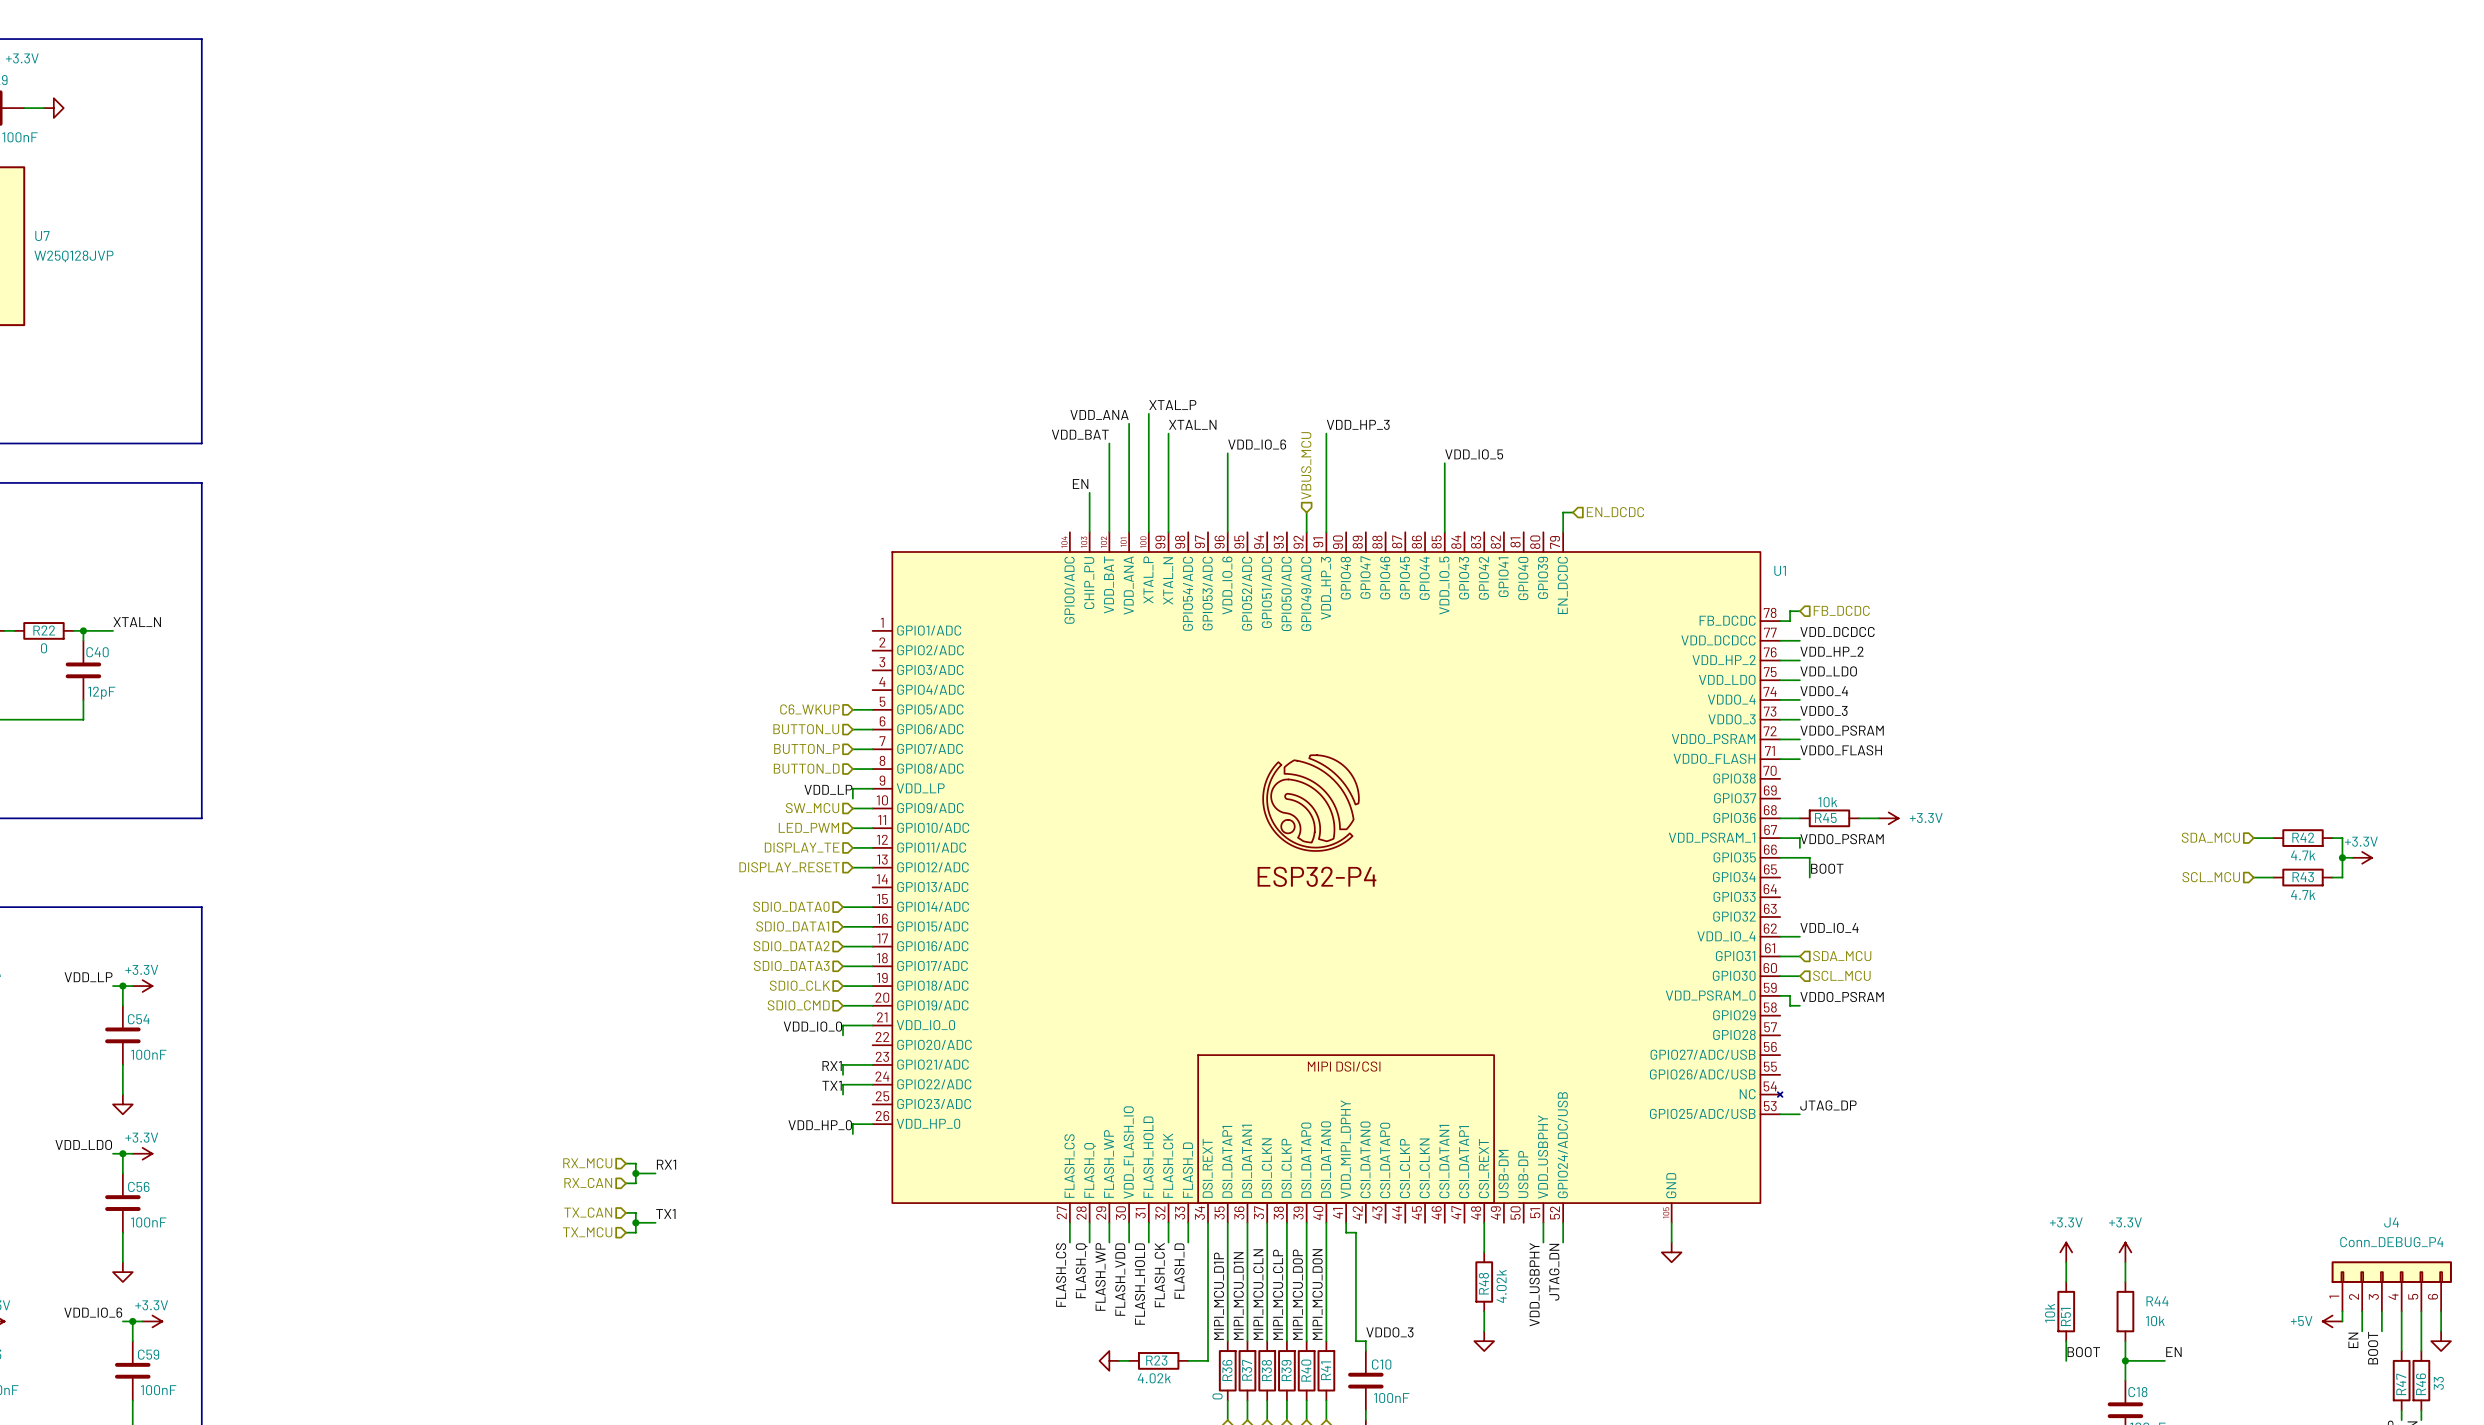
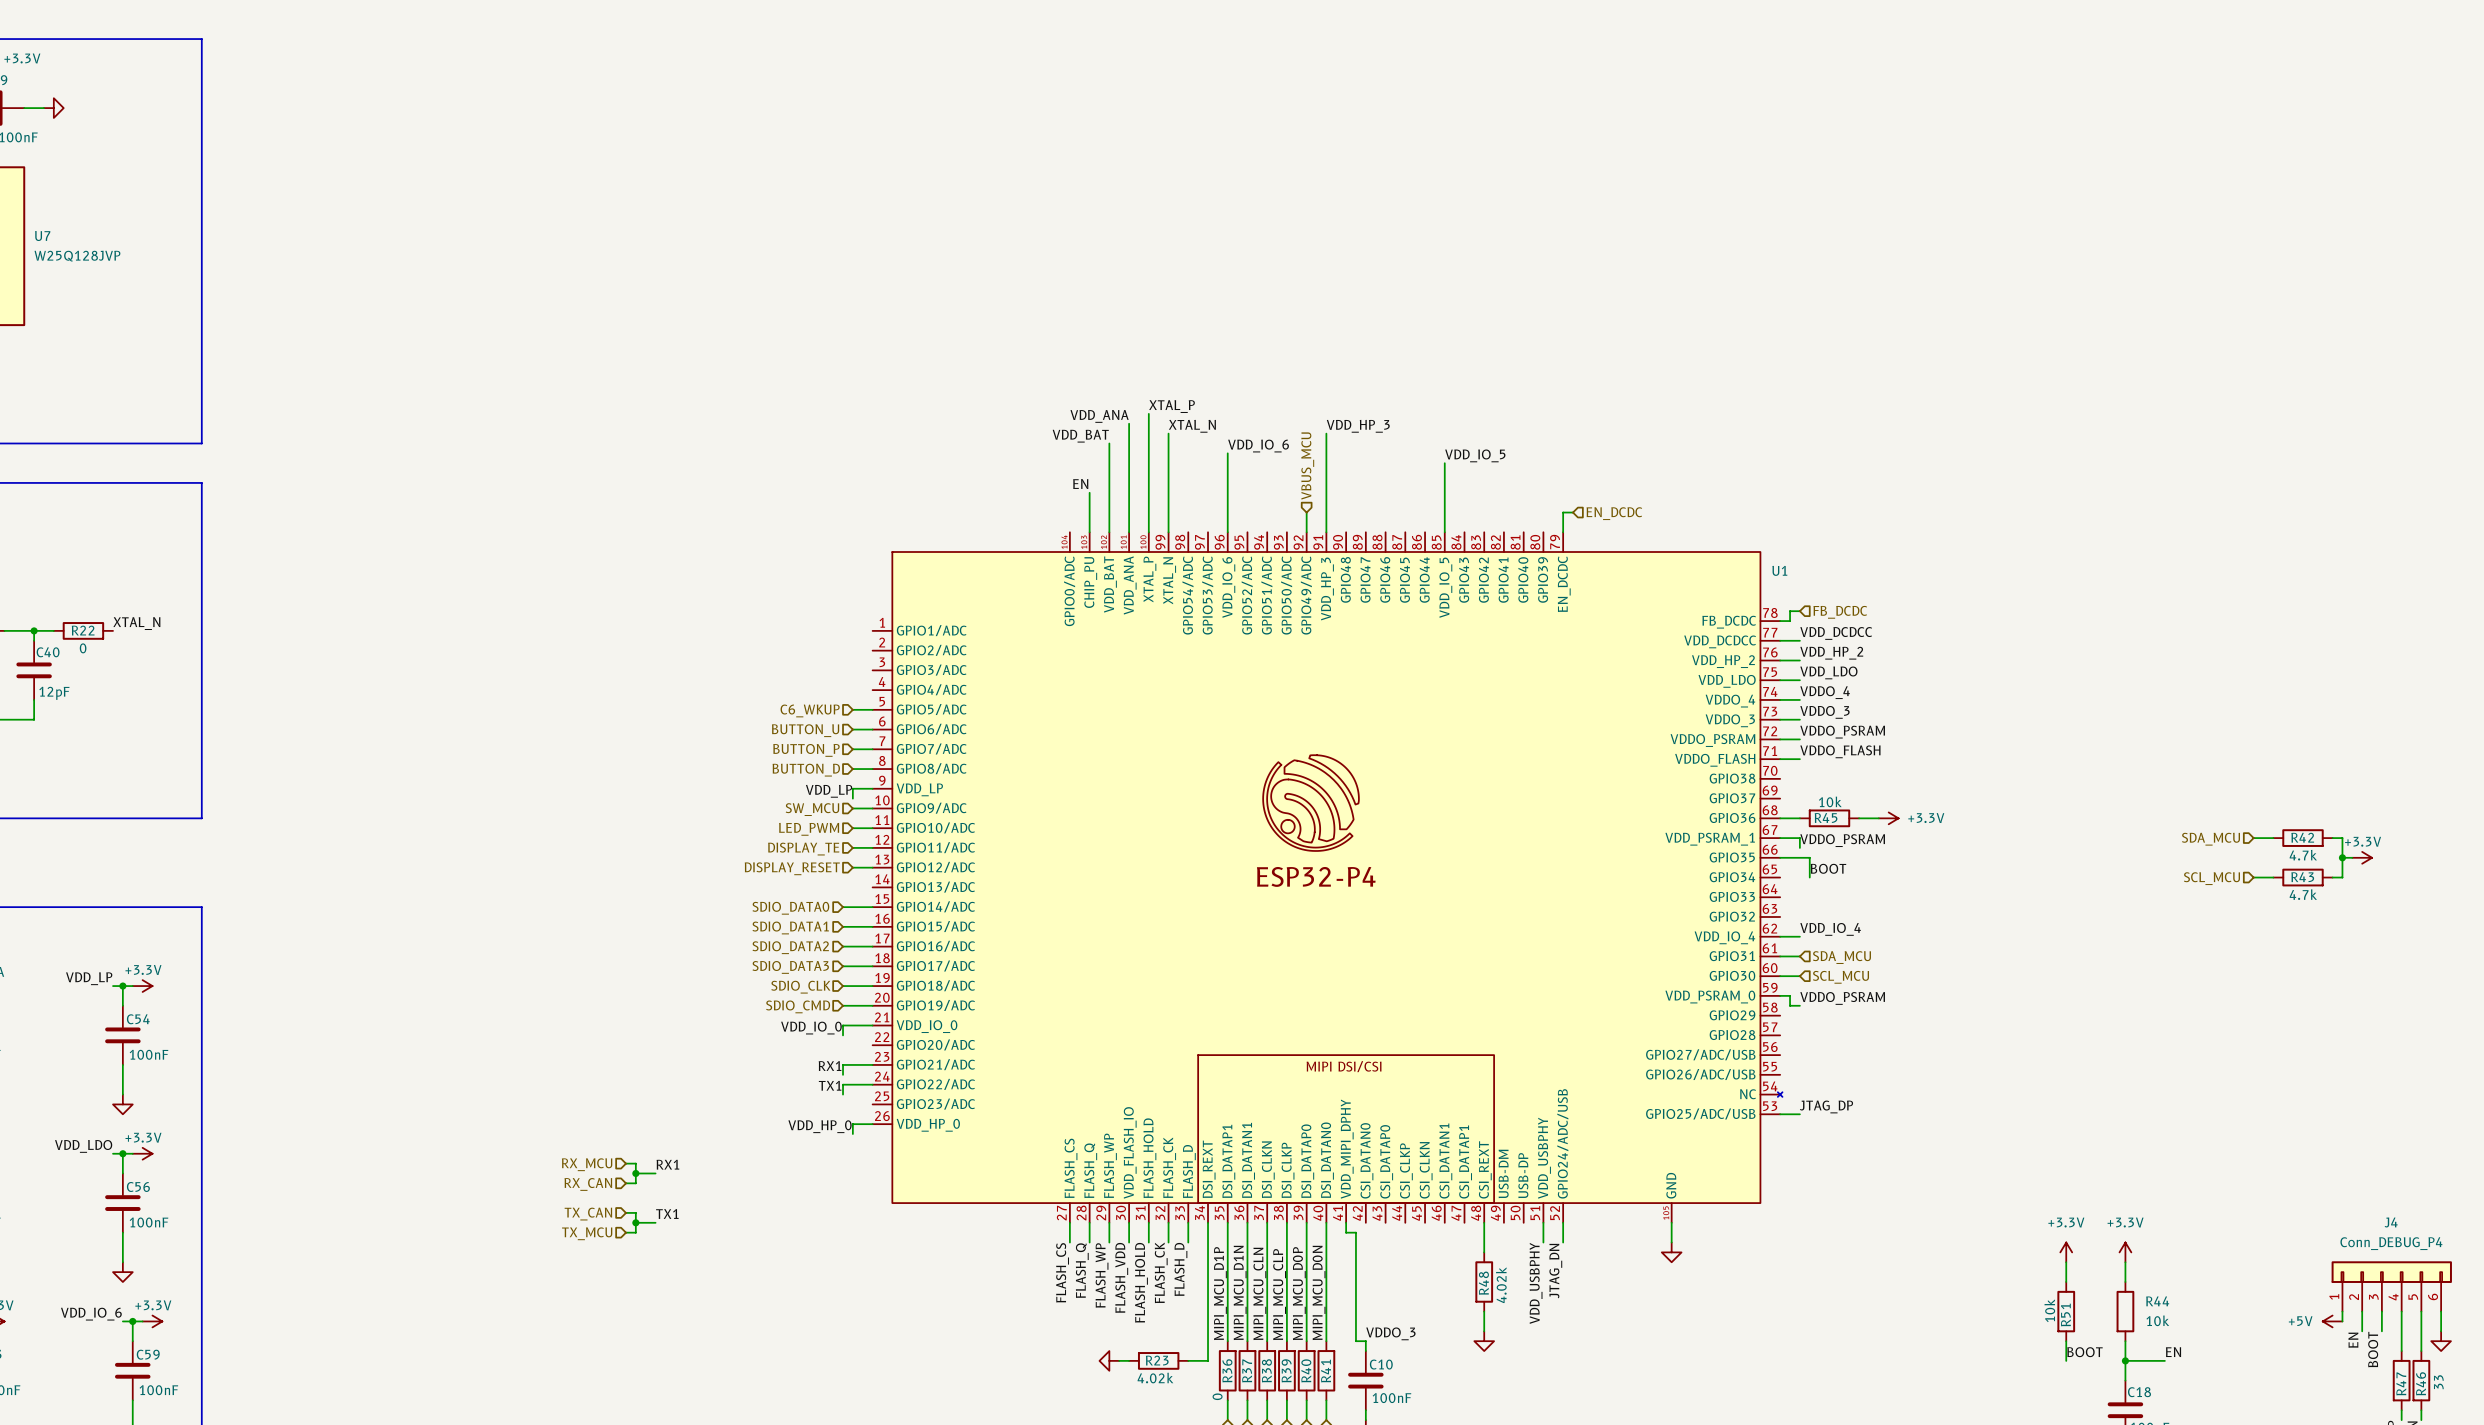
junction: none -> (34, 630)
R22 position: (43, 630) -> (83, 630)
wire: (73, 630) (113, 630) -> (14, 630) (53, 630)
wire: (83, 630) (83, 640) -> (34, 630) (34, 640)
junction: (83, 630) -> none
C40 position: (83, 670) -> (34, 670)
wire: (83, 699) (83, 719) (34, 719) -> (34, 699) (34, 719)

